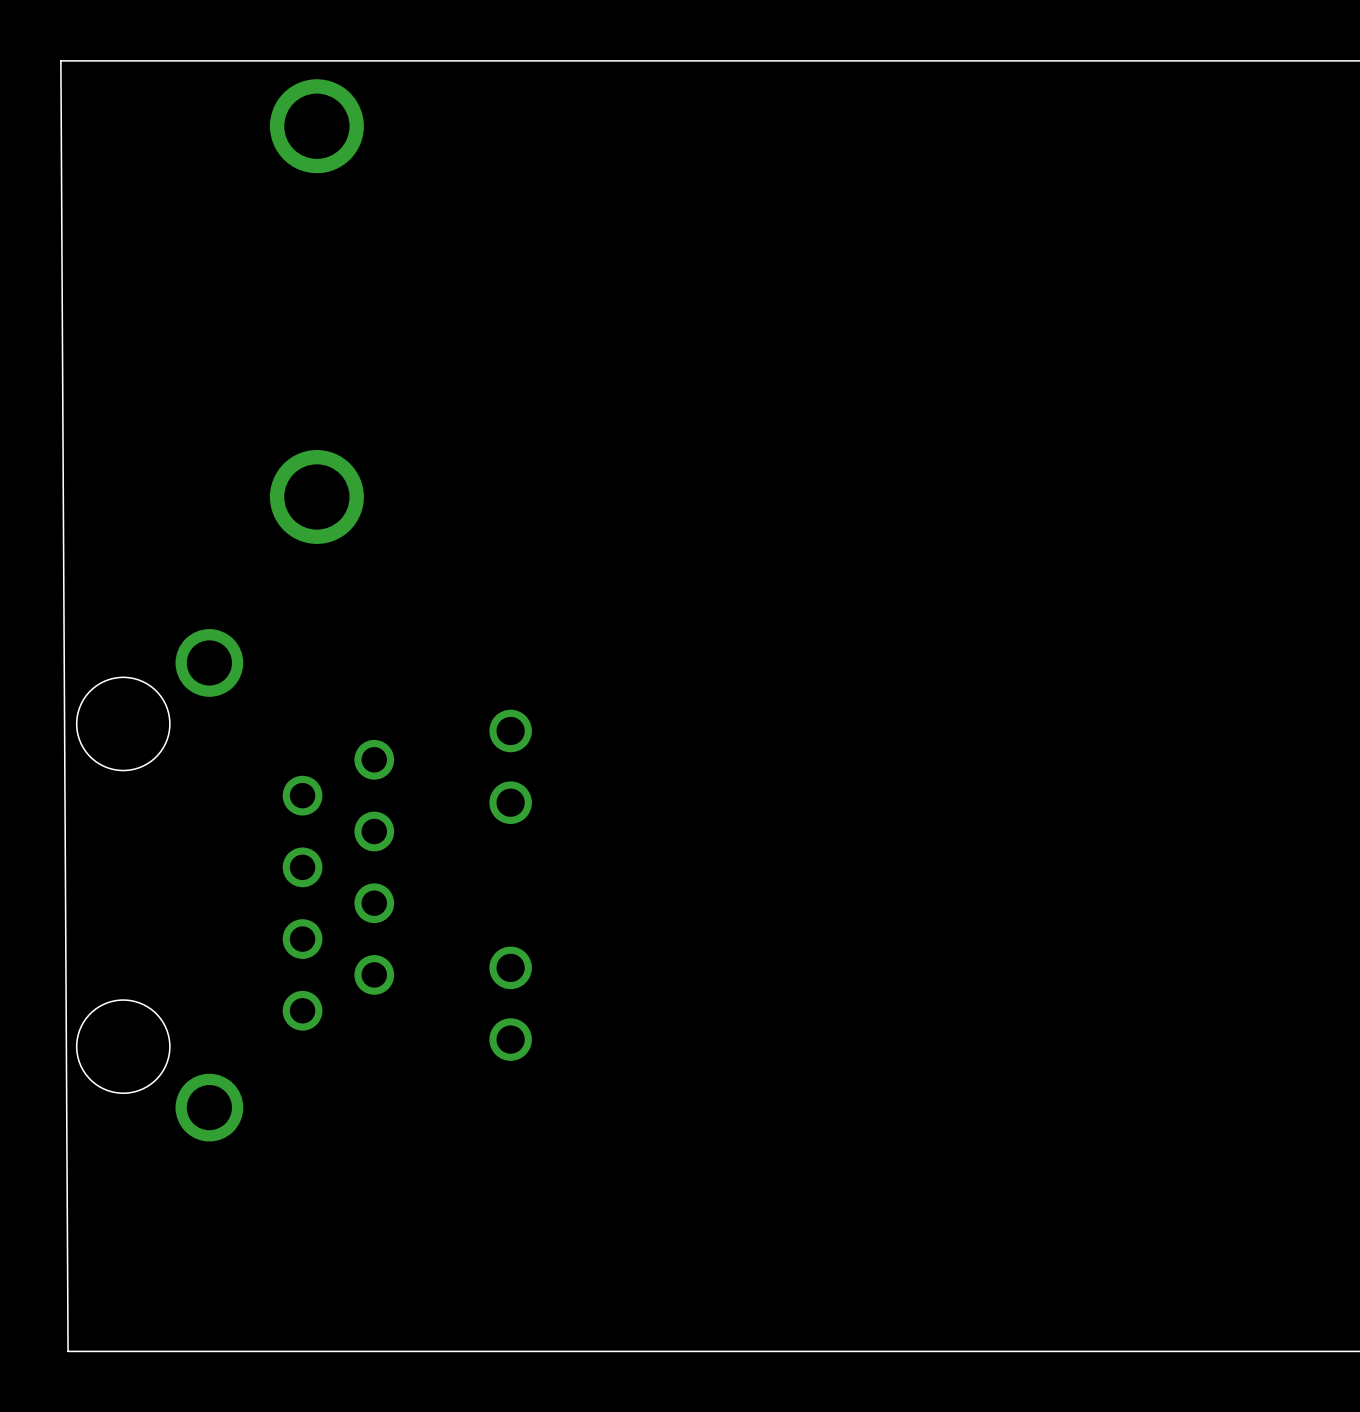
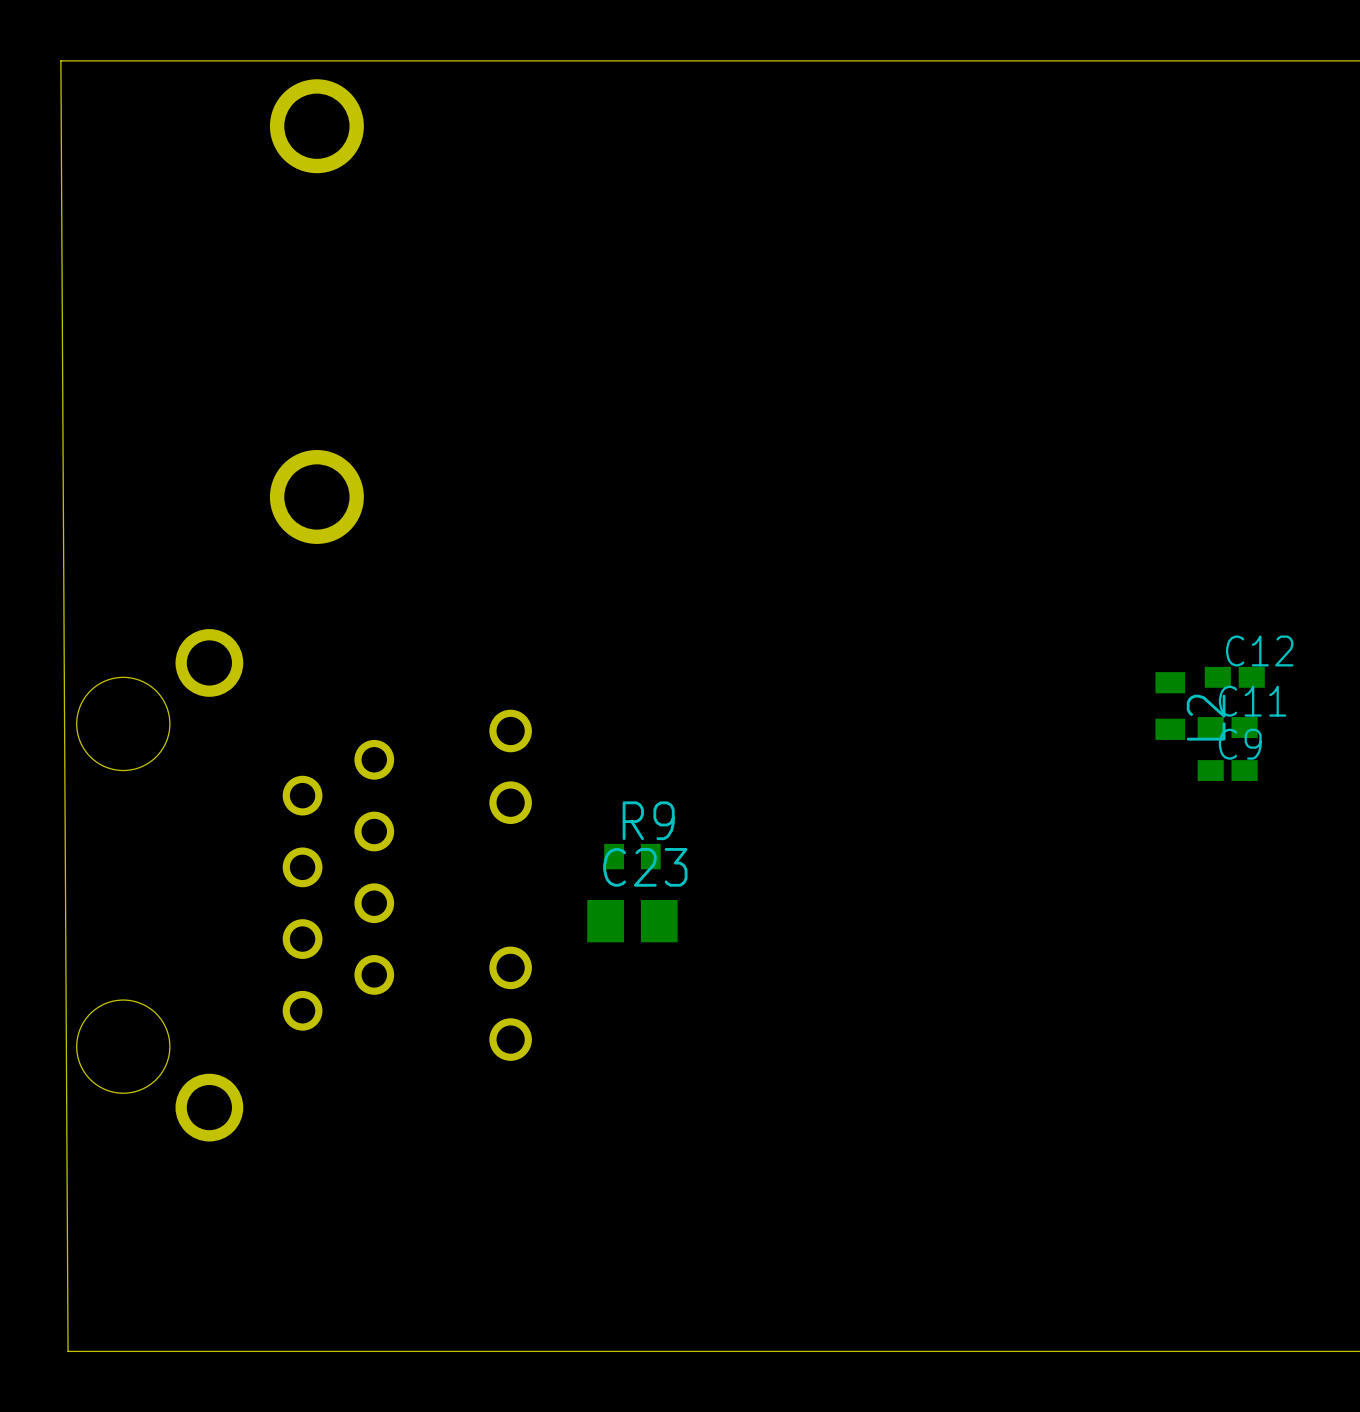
C12: none -> (1234, 677)
L2: none -> (1170, 706)
C11: none -> (1227, 727)
C9: none -> (1227, 770)
R9: none -> (632, 856)
C23: none -> (632, 921)

